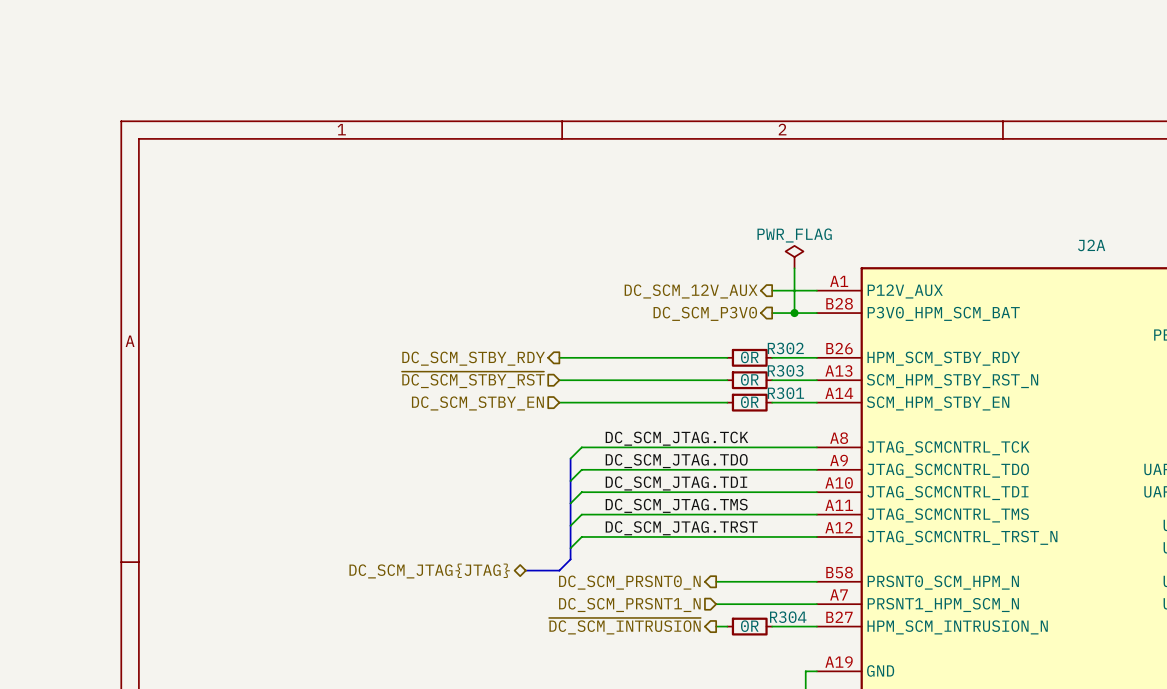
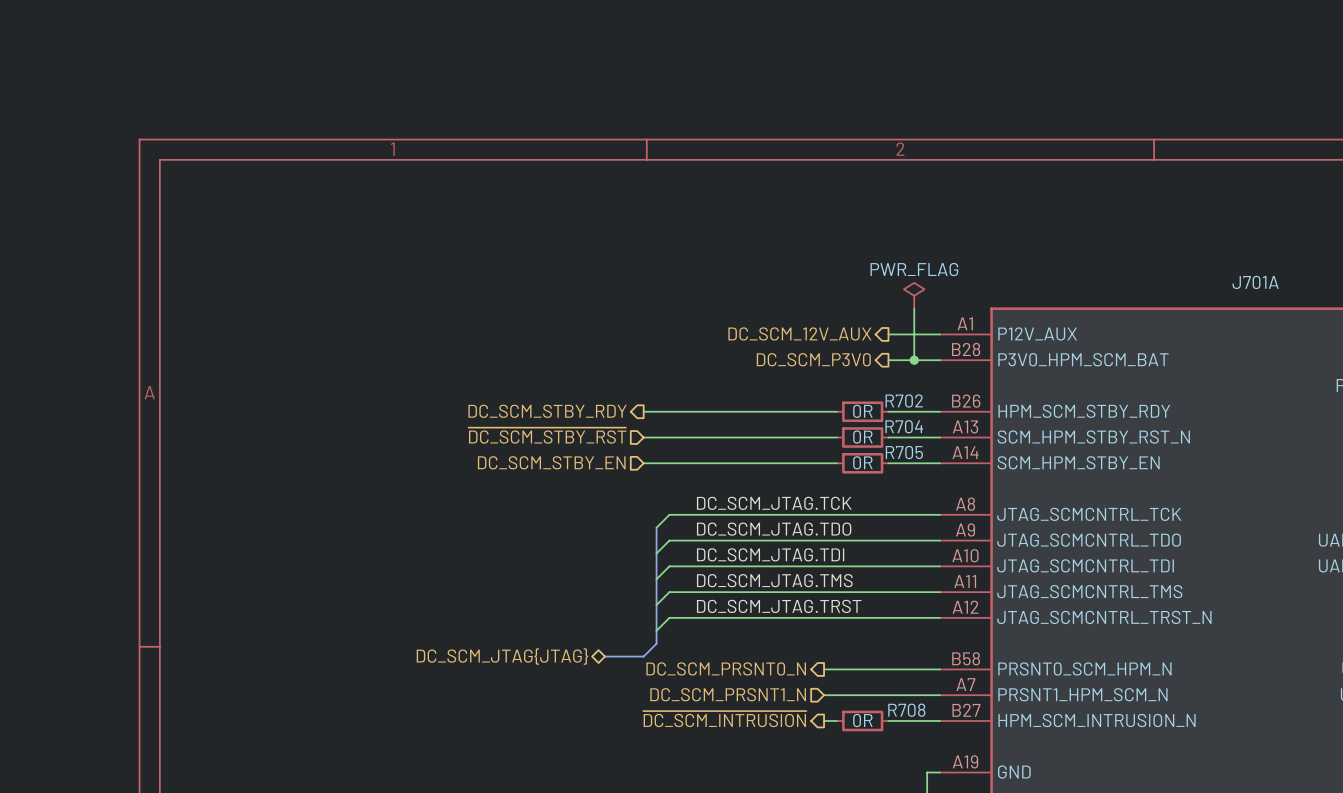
J2A name: J2A (1091, 245) -> J701A (1255, 282)
R302 name: R302 (785, 348) -> R702 (904, 400)
R303 name: R303 (785, 370) -> R704 (904, 426)
R301 name: R301 (785, 393) -> R705 (904, 452)
R304 name: R304 (788, 617) -> R708 (906, 710)

